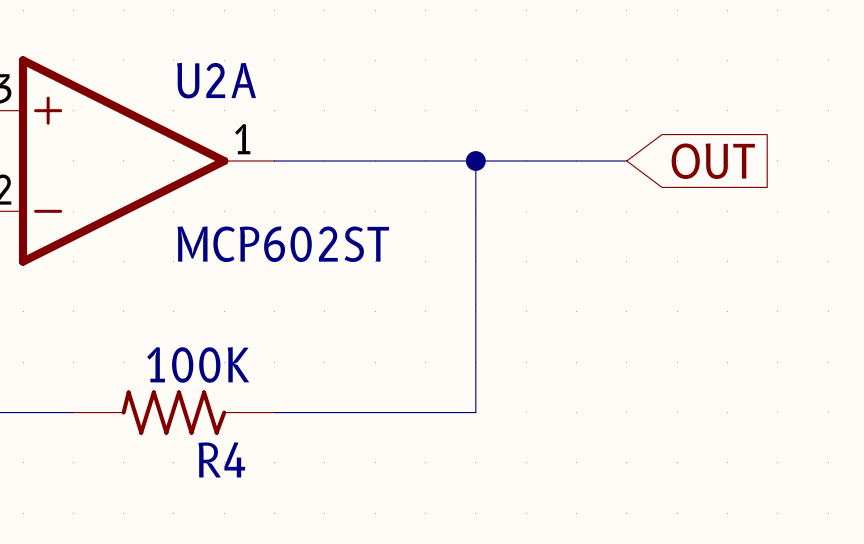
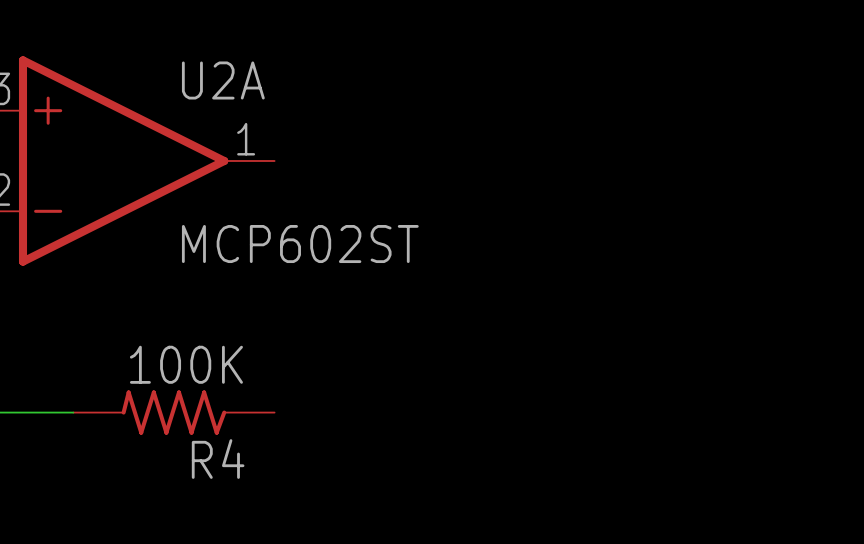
wire: (274, 160) (626, 160) -> none
wire: (475, 160) (475, 412) (274, 412) -> none
junction: (475, 160) -> none
global label: OUT (713, 161) -> none

